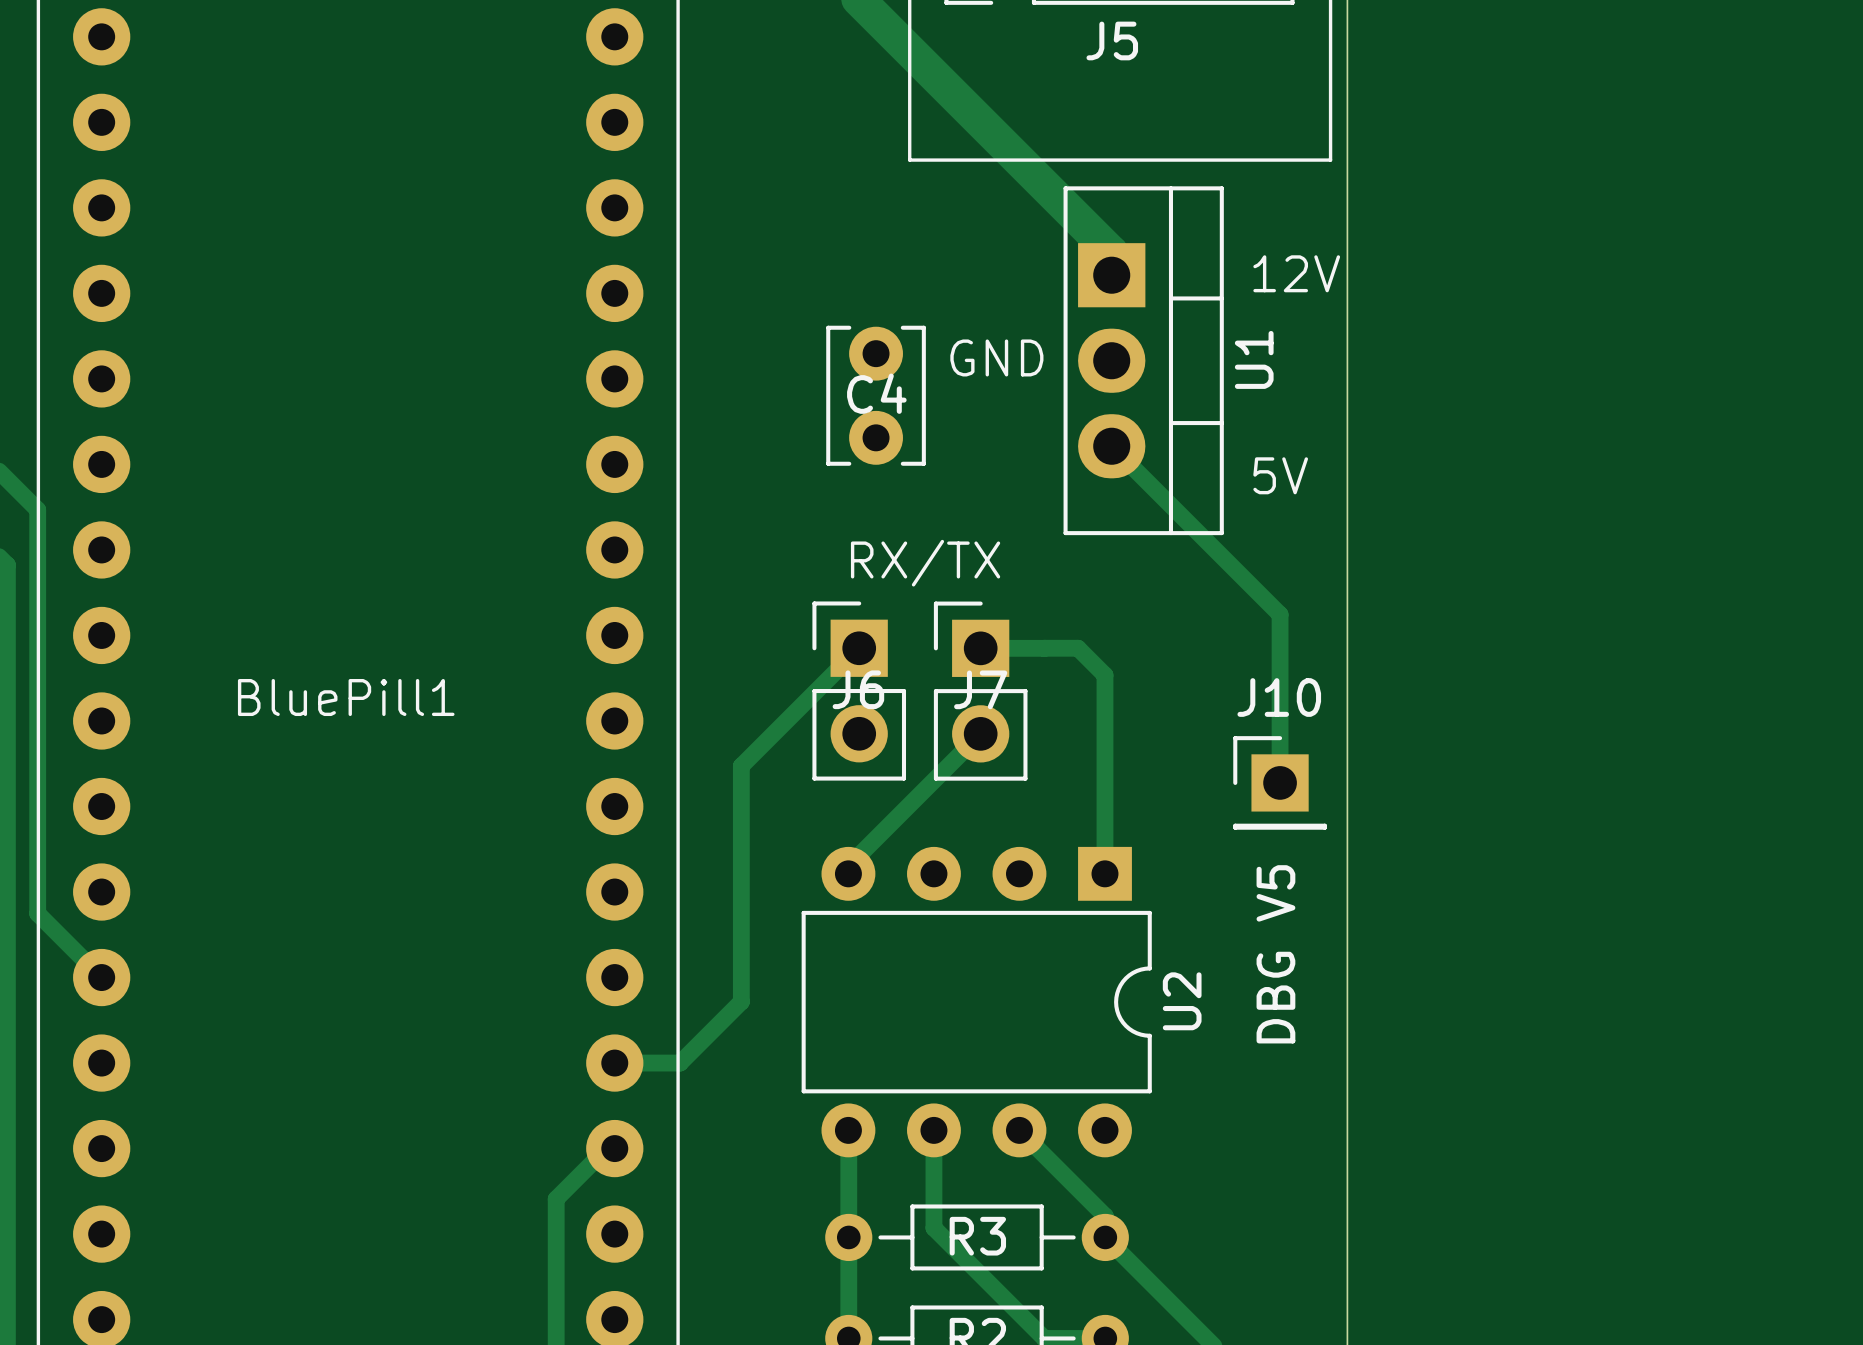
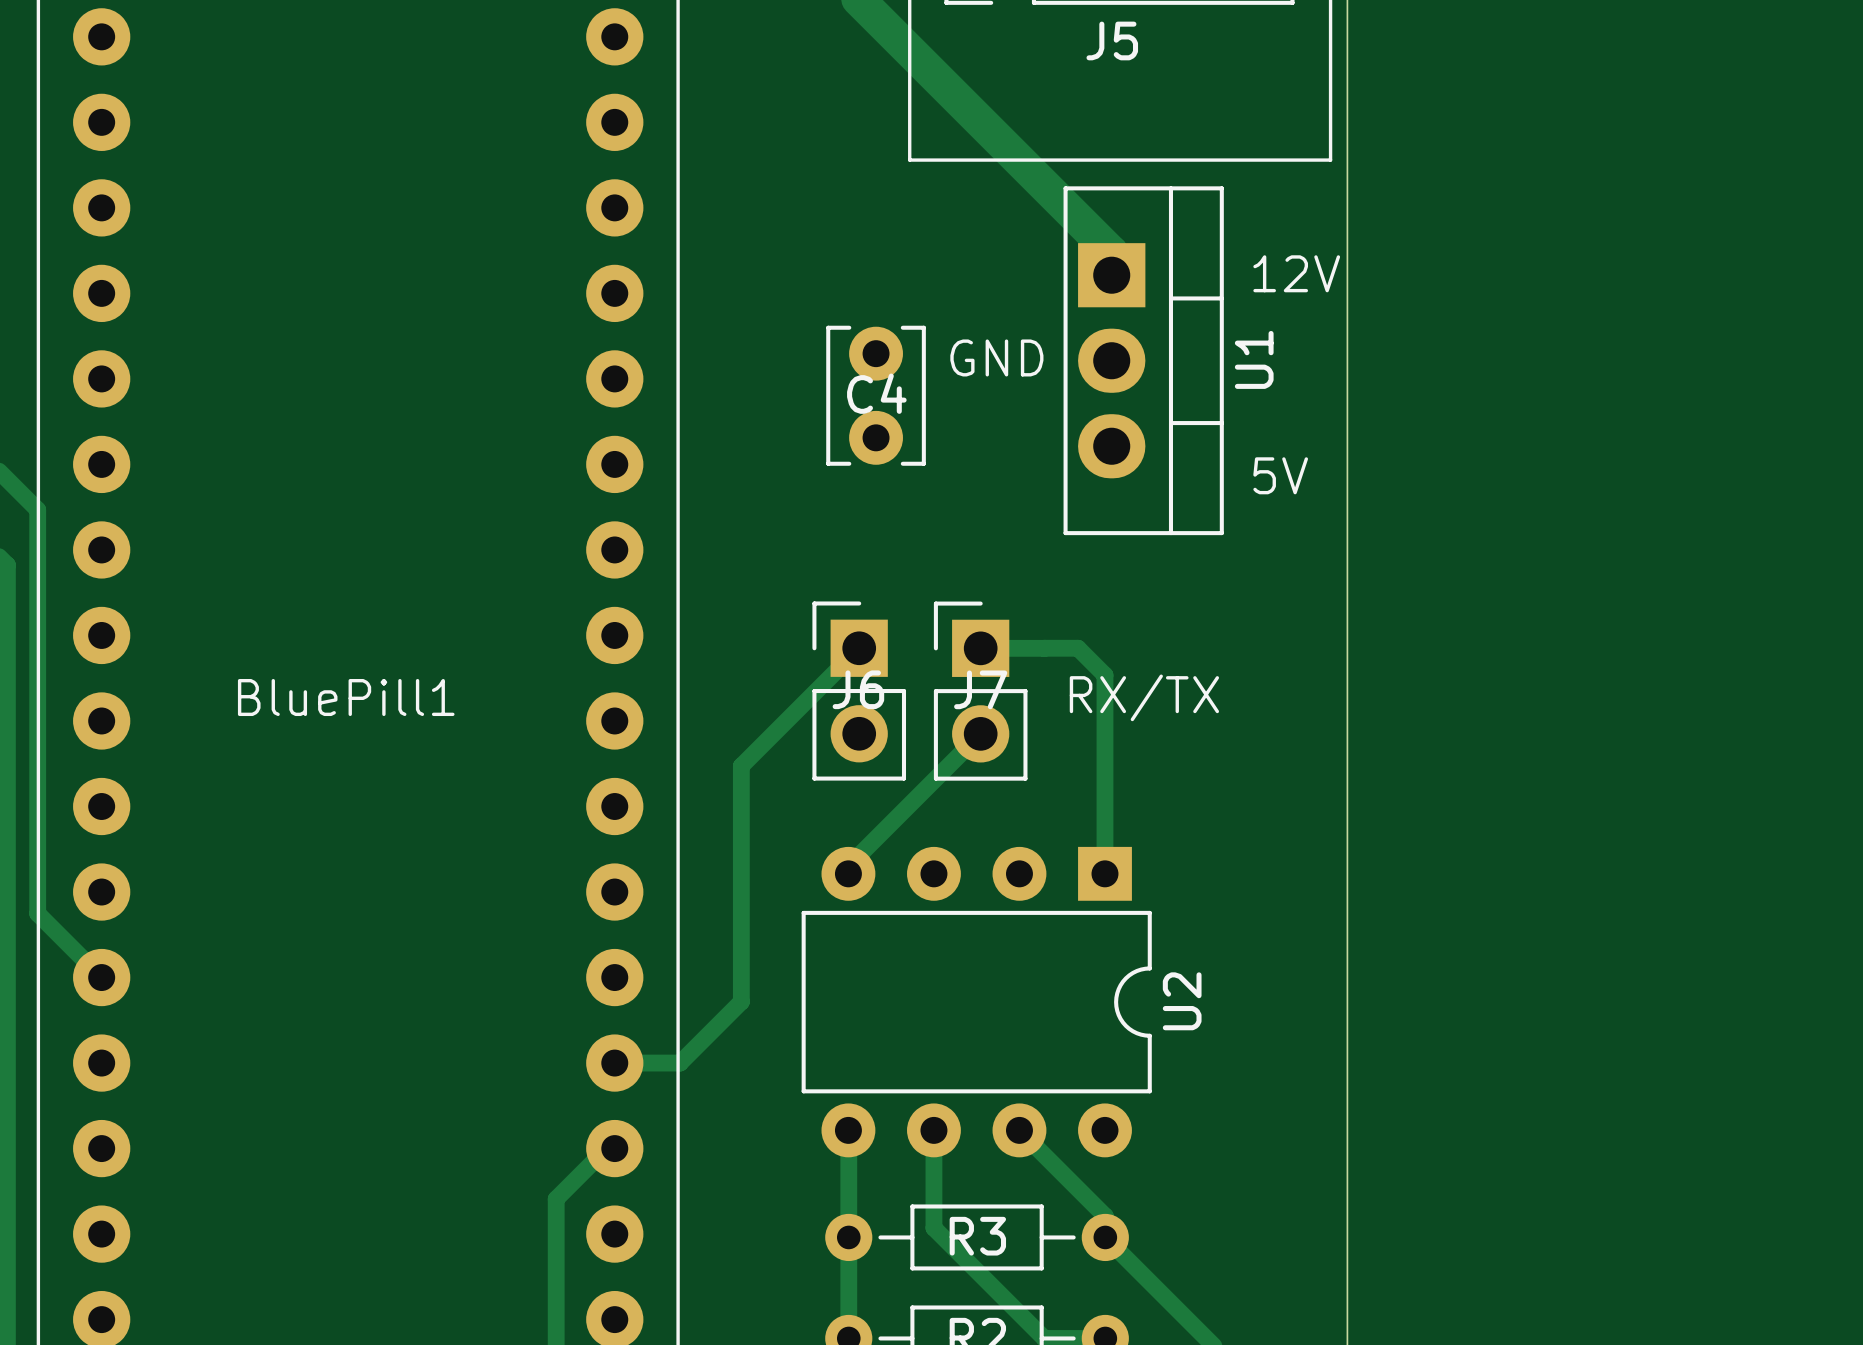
track: (1111, 446) (1280, 614) (1280, 782) -> none
text position: RX/TX (925, 563) -> RX/TX (1144, 697)
J10: (1280, 782) -> none
text: DBG V5 (1275, 954) -> none

